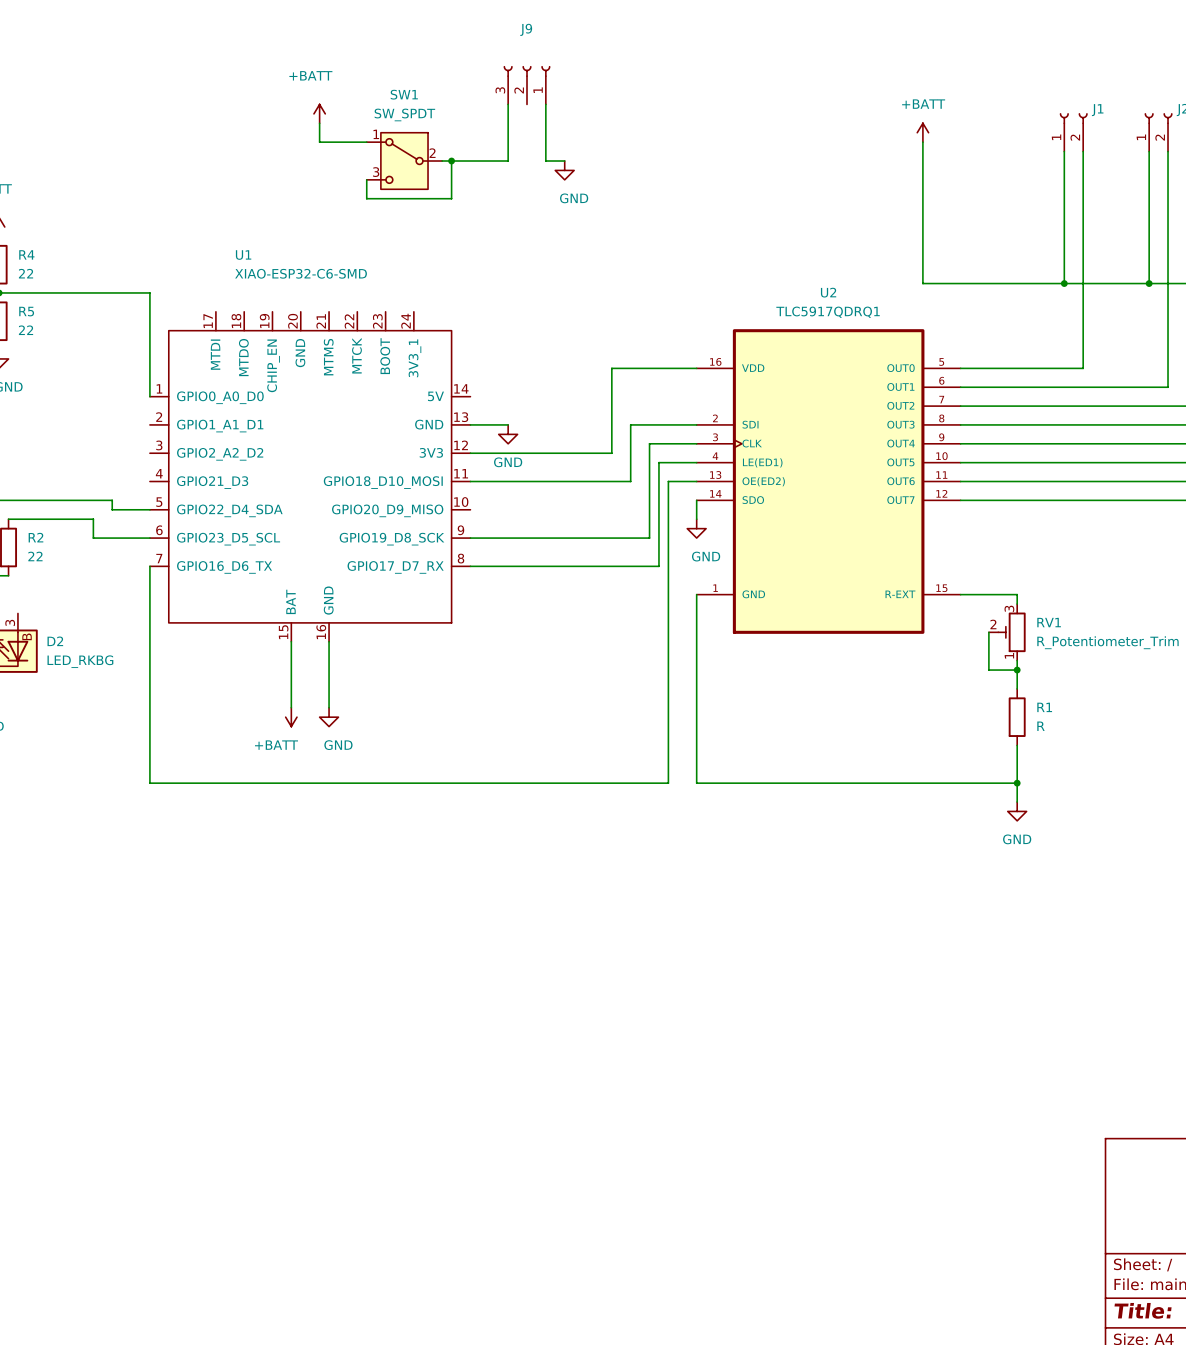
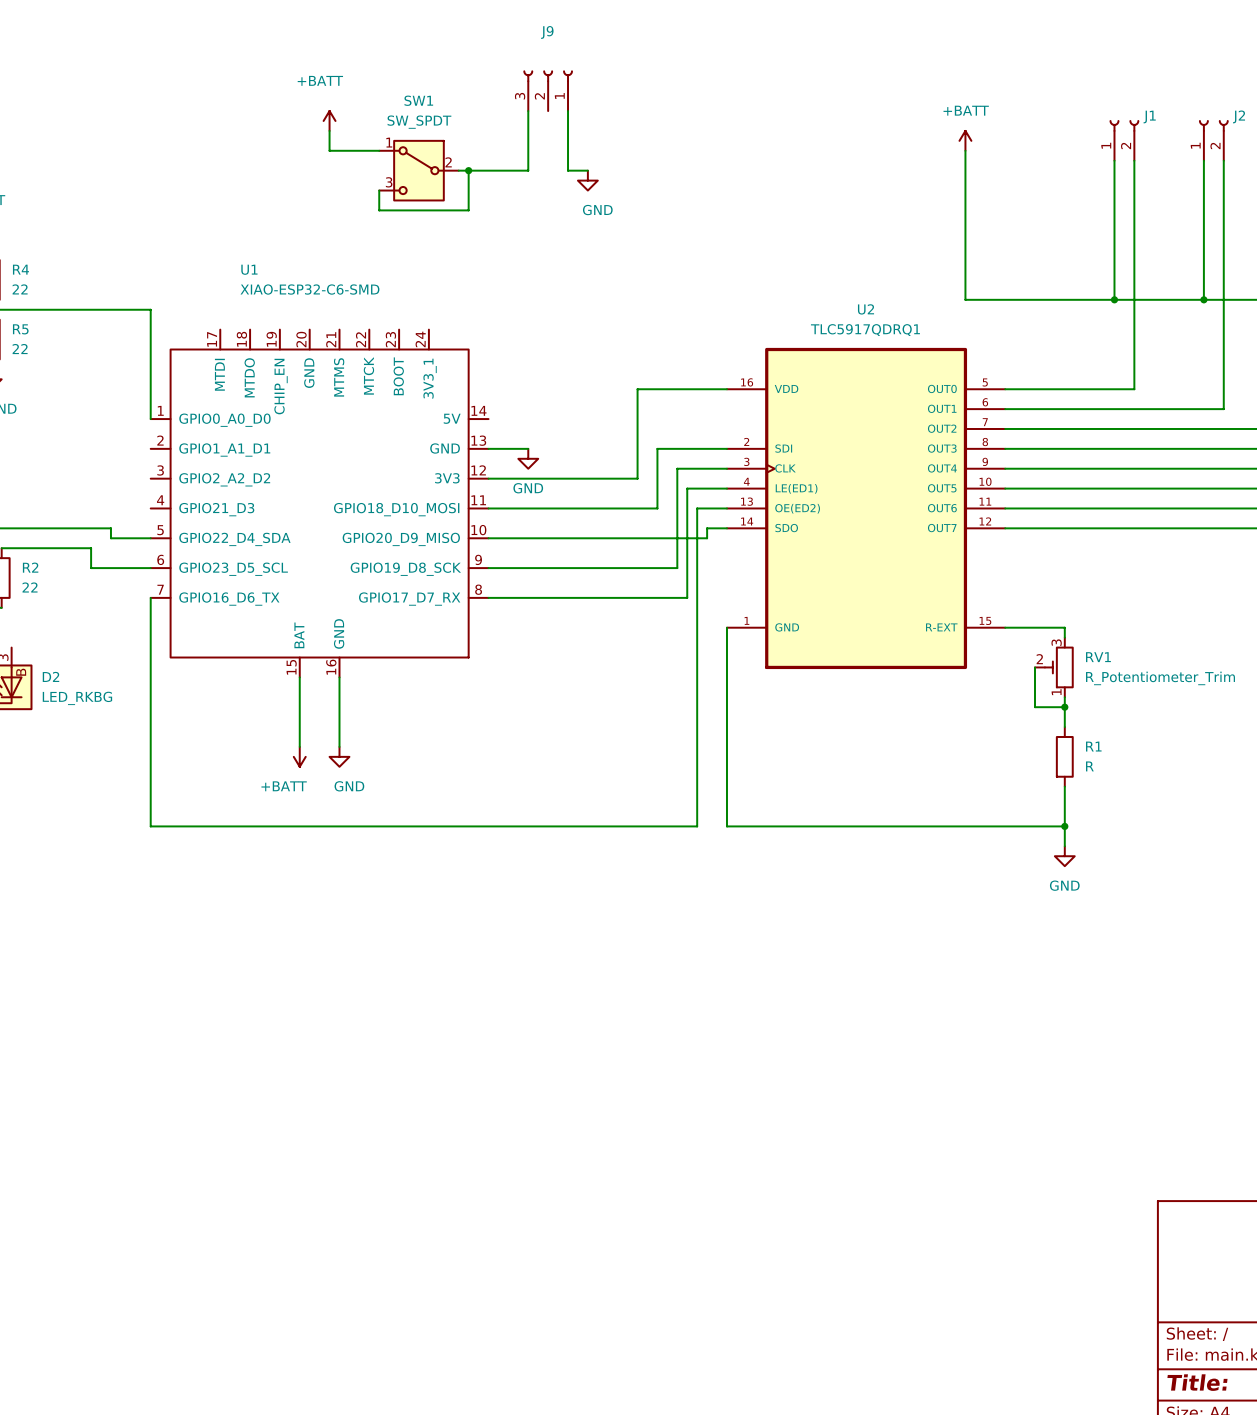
wire: (696, 500) (696, 519) -> (726, 528) (707, 528) (707, 538) (488, 538)
power symbol: GND (696, 528) -> none

